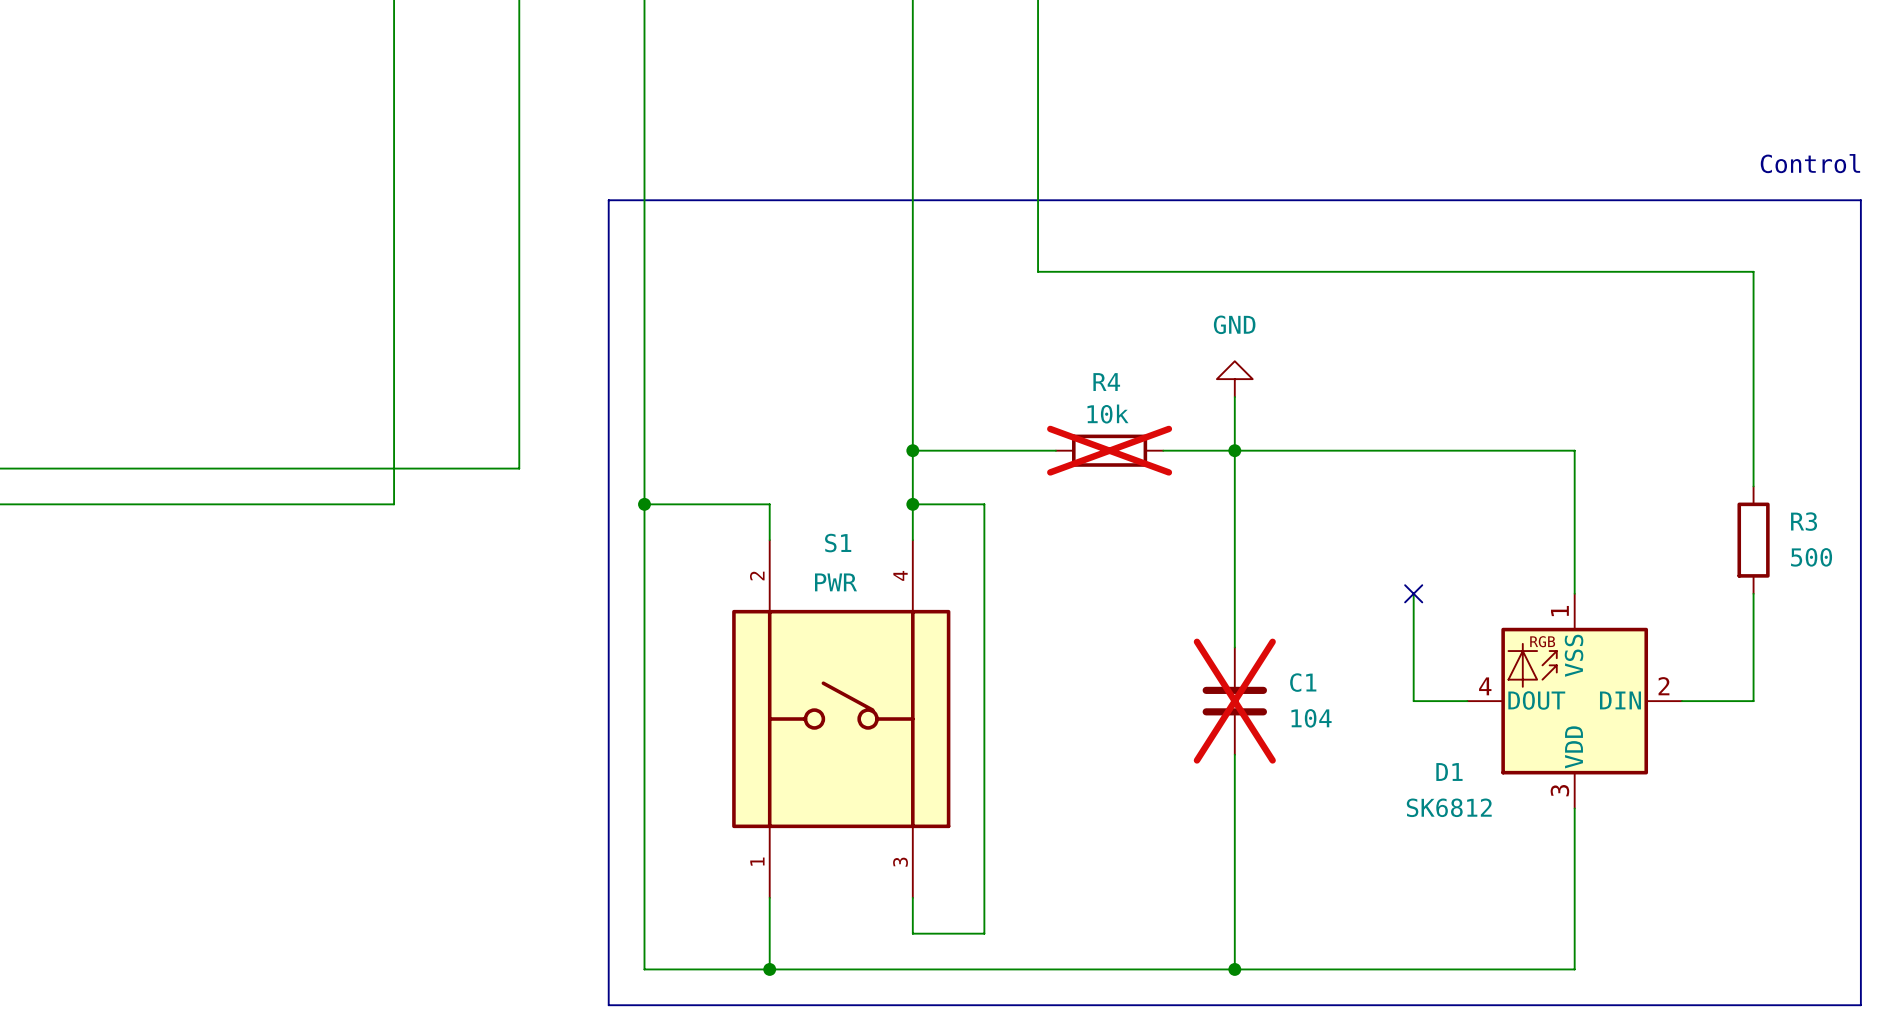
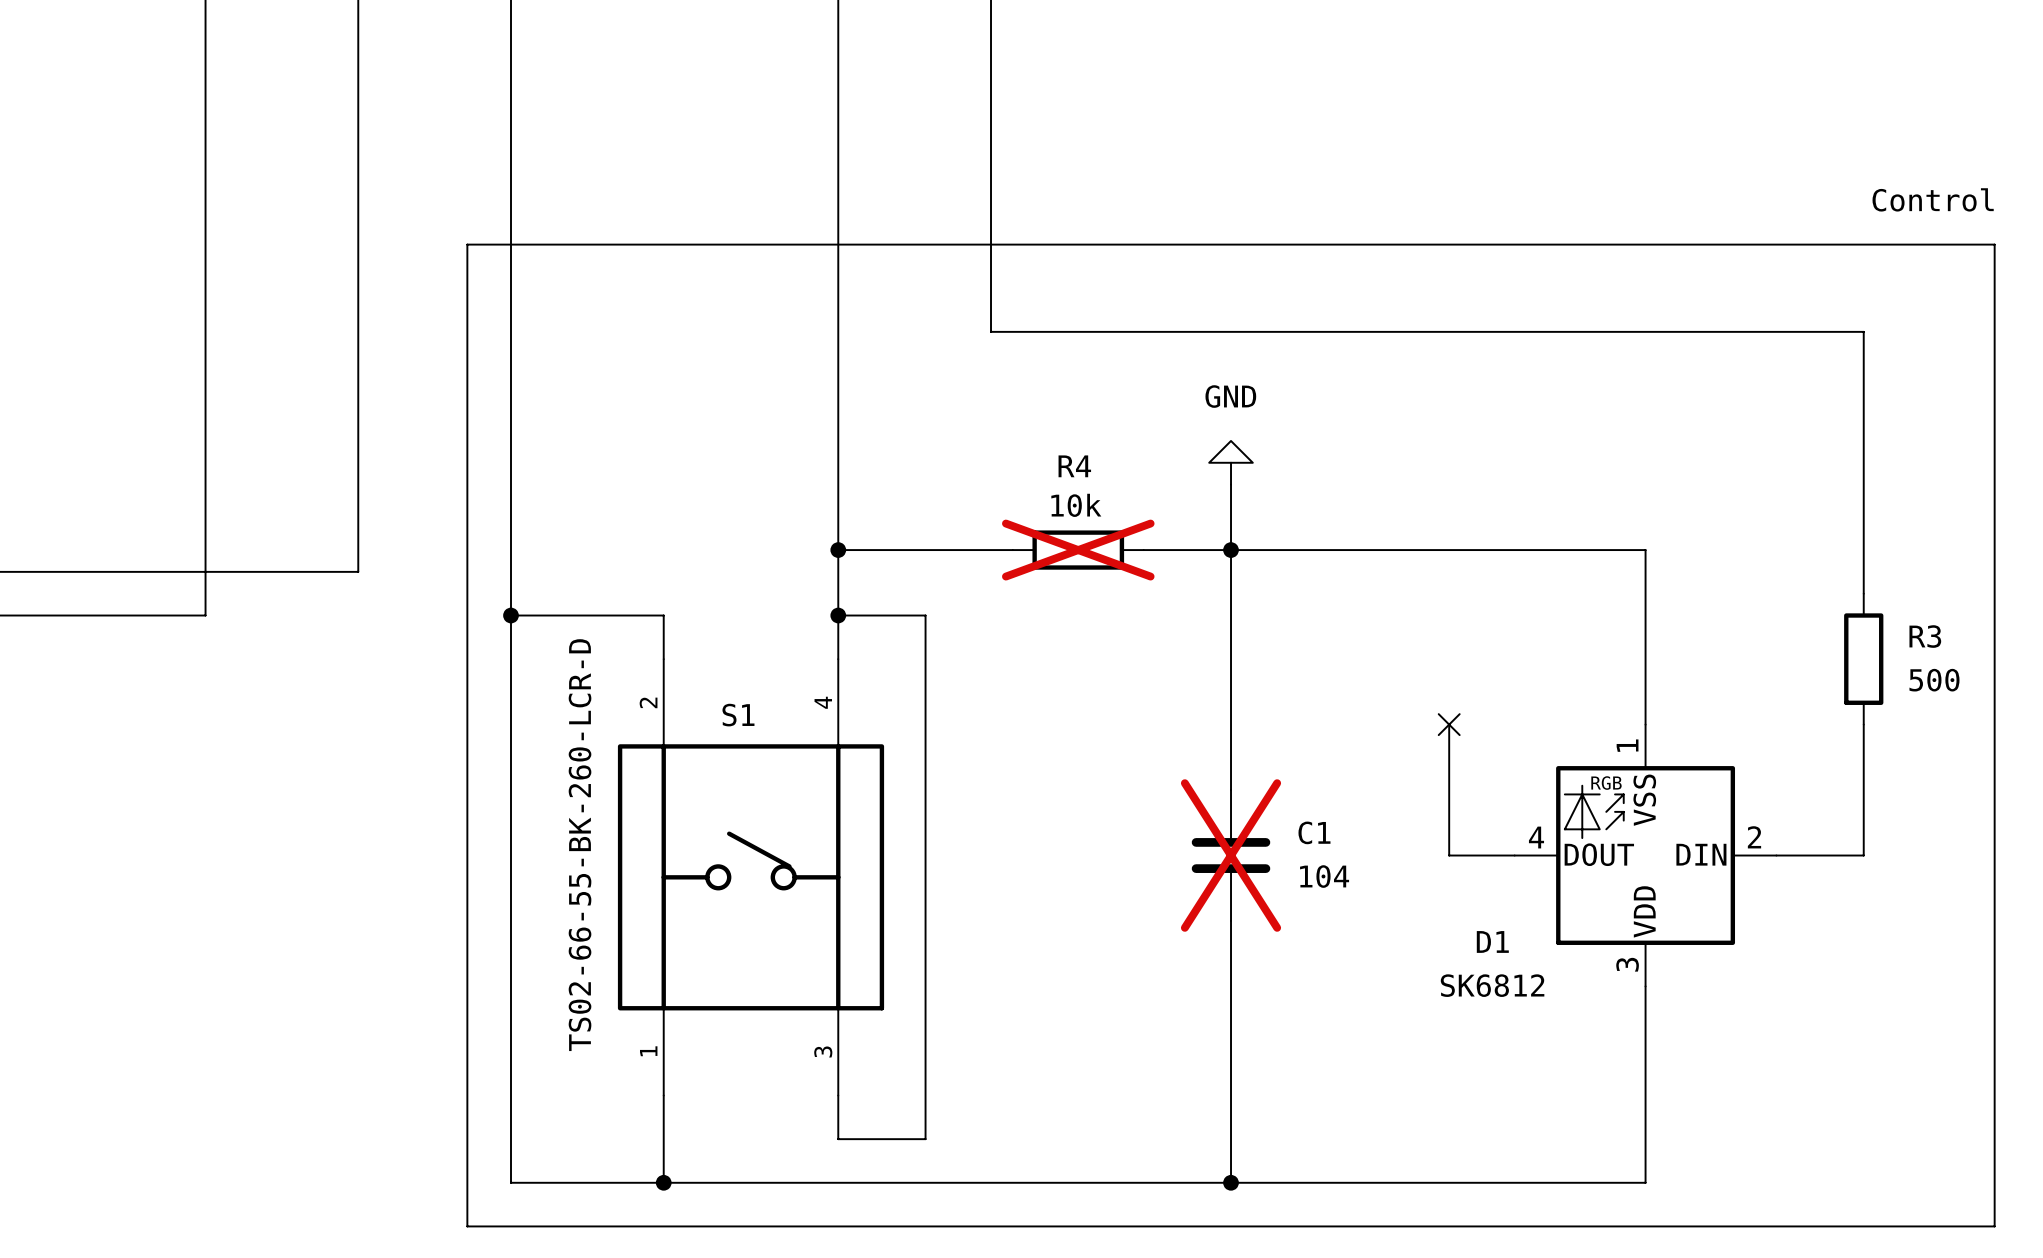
S1 name position: S1 (838, 543) -> S1 (738, 715)
S1 value: PWR (835, 582) -> TS02-66-55-BK-260-LCR-D (580, 845)

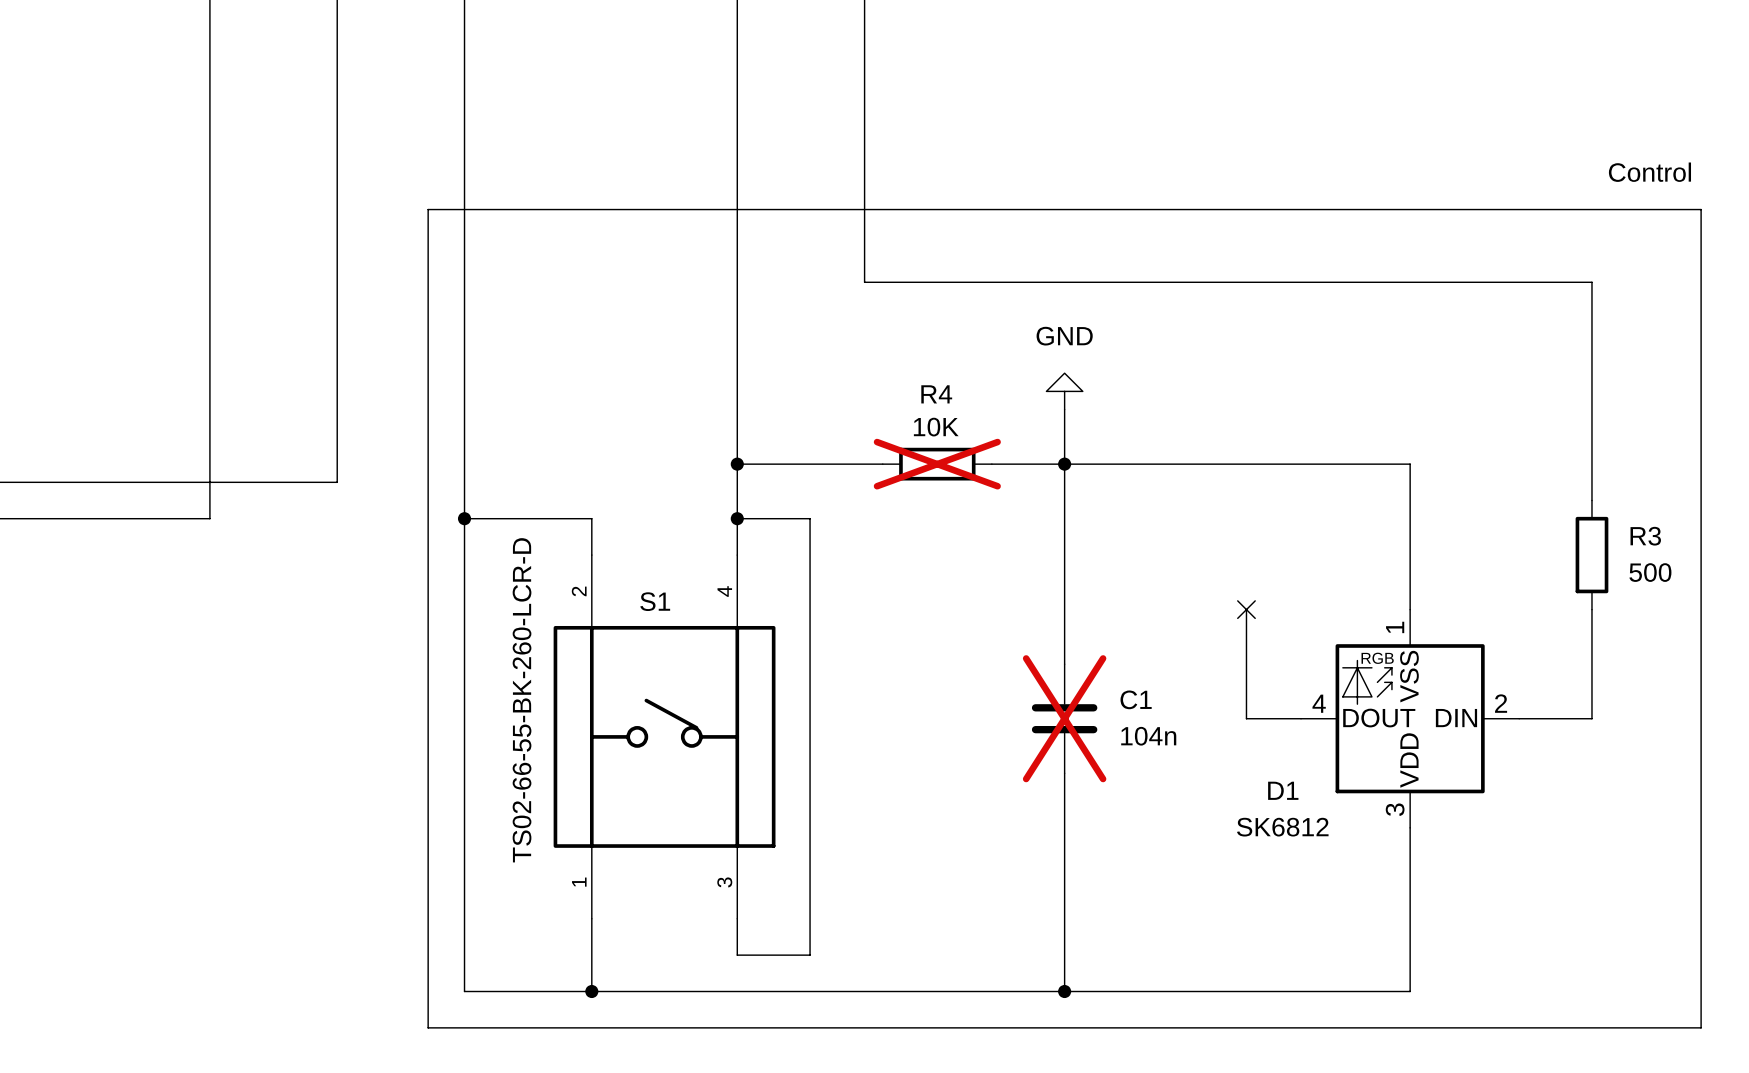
R4 value: 10k (1076, 505) -> 10K (936, 427)
C1 value: 104 (1324, 876) -> 104n (1148, 736)

